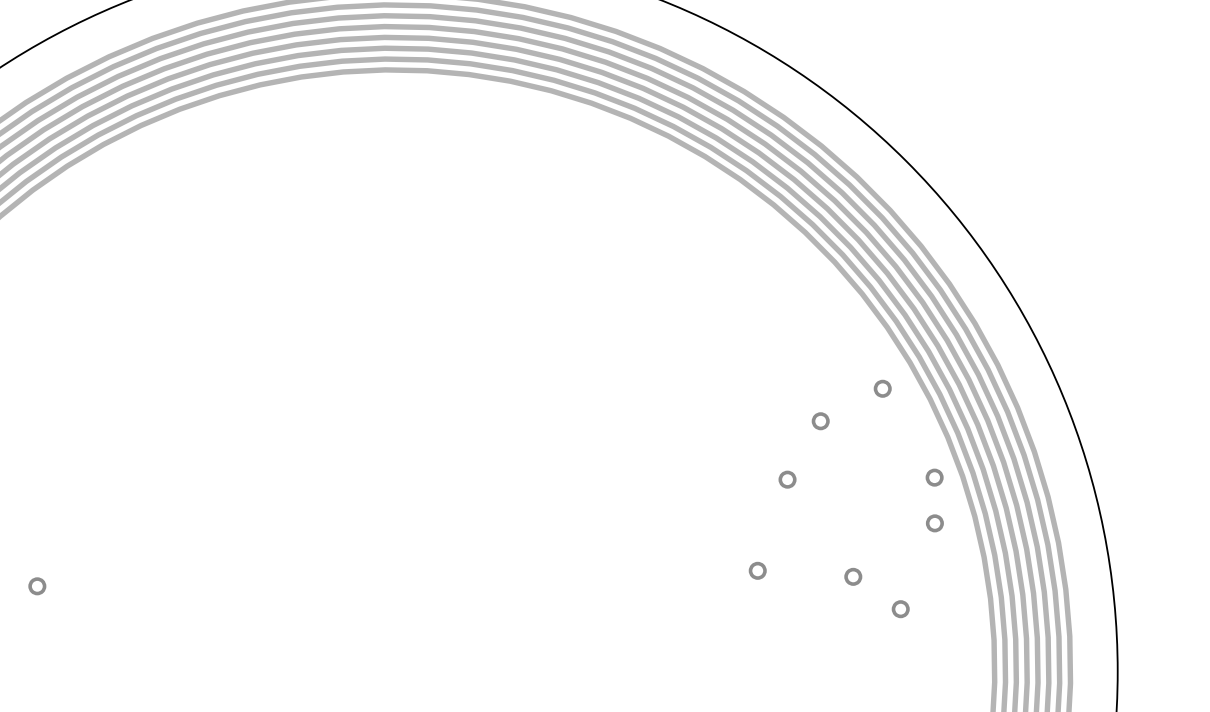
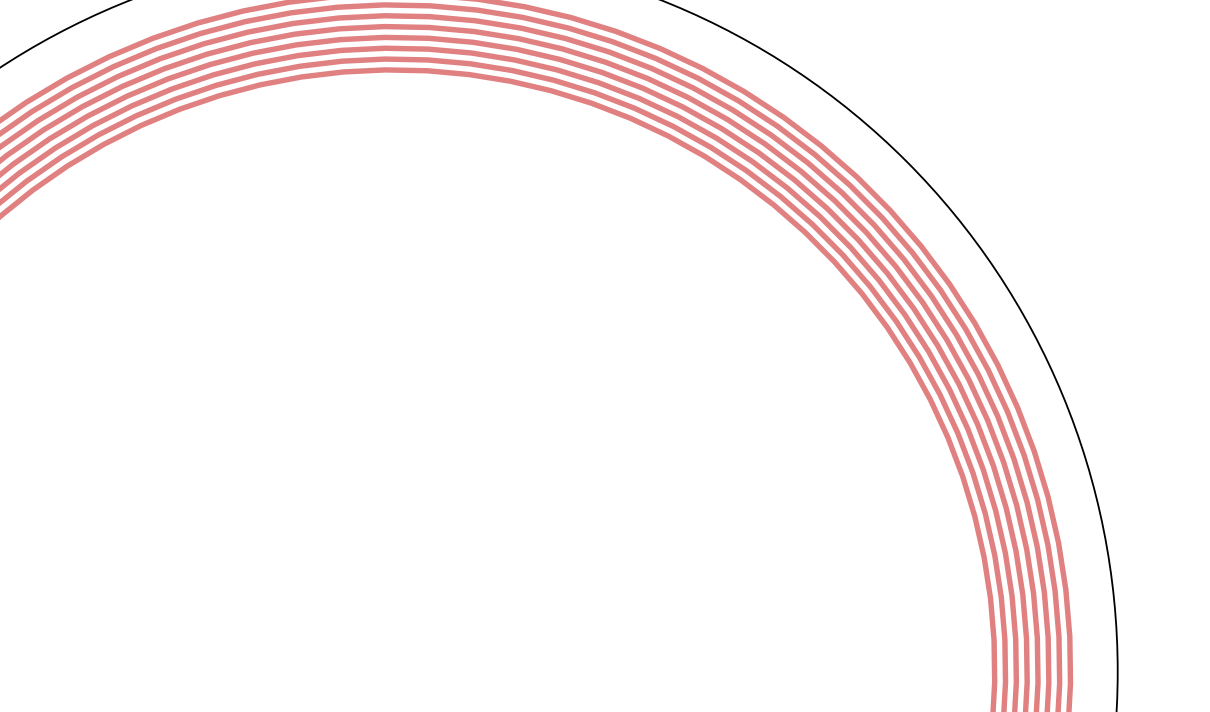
via: (882, 388) -> none
via: (820, 421) -> none
via: (934, 477) -> none
via: (787, 479) -> none
via: (934, 523) -> none
via: (757, 570) -> none
via: (853, 576) -> none
via: (37, 586) -> none
via: (900, 609) -> none

